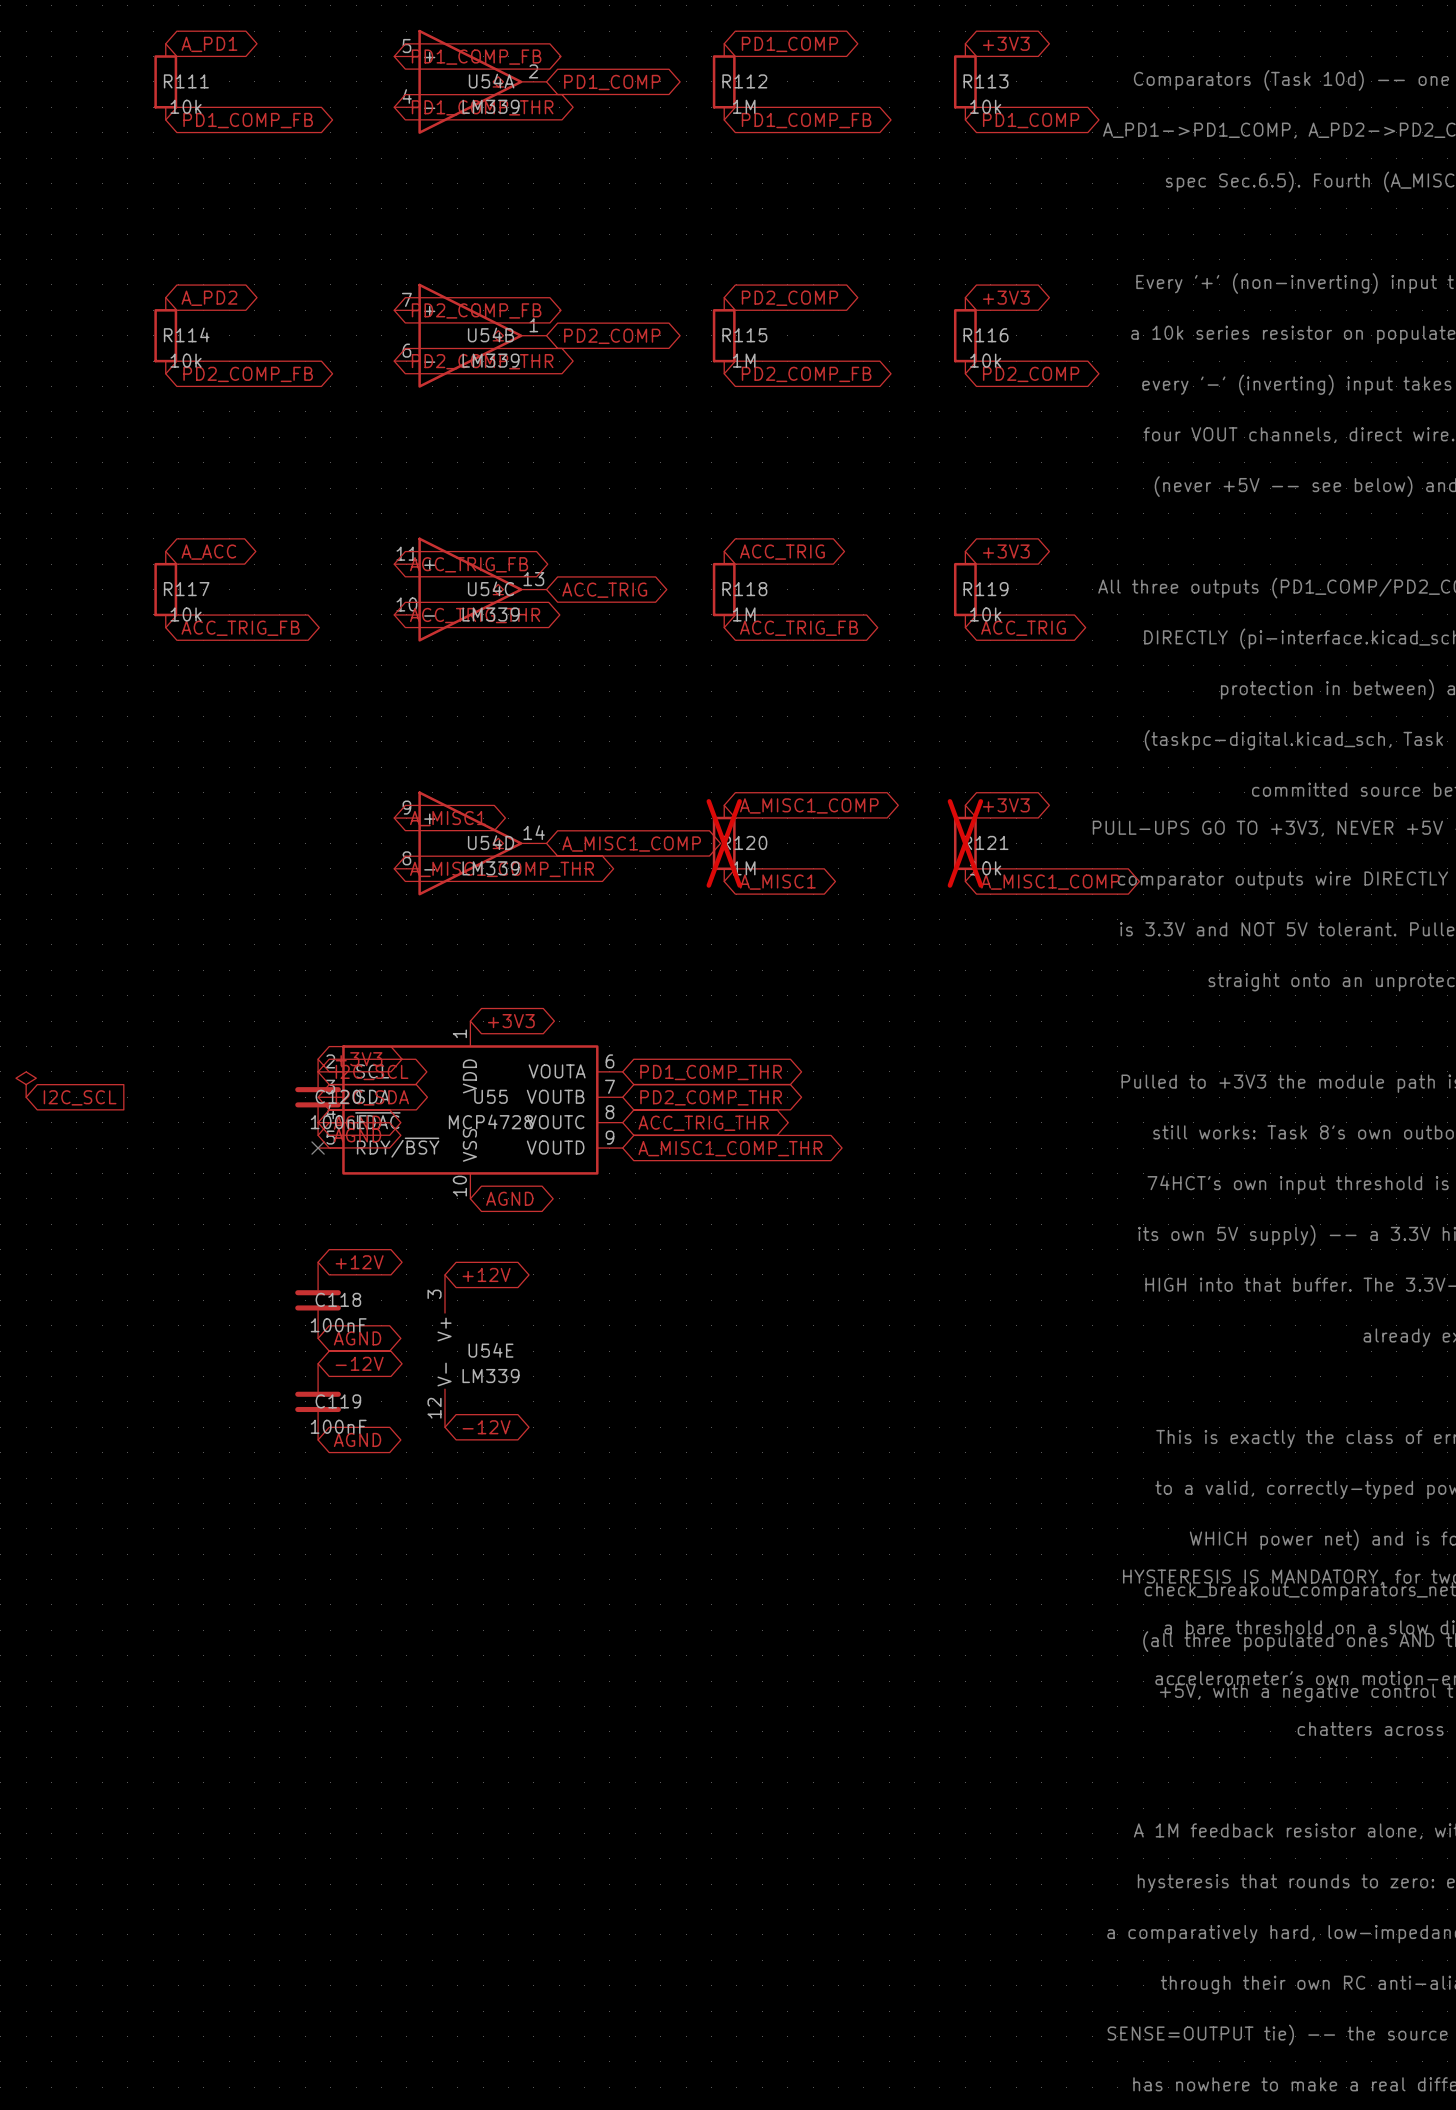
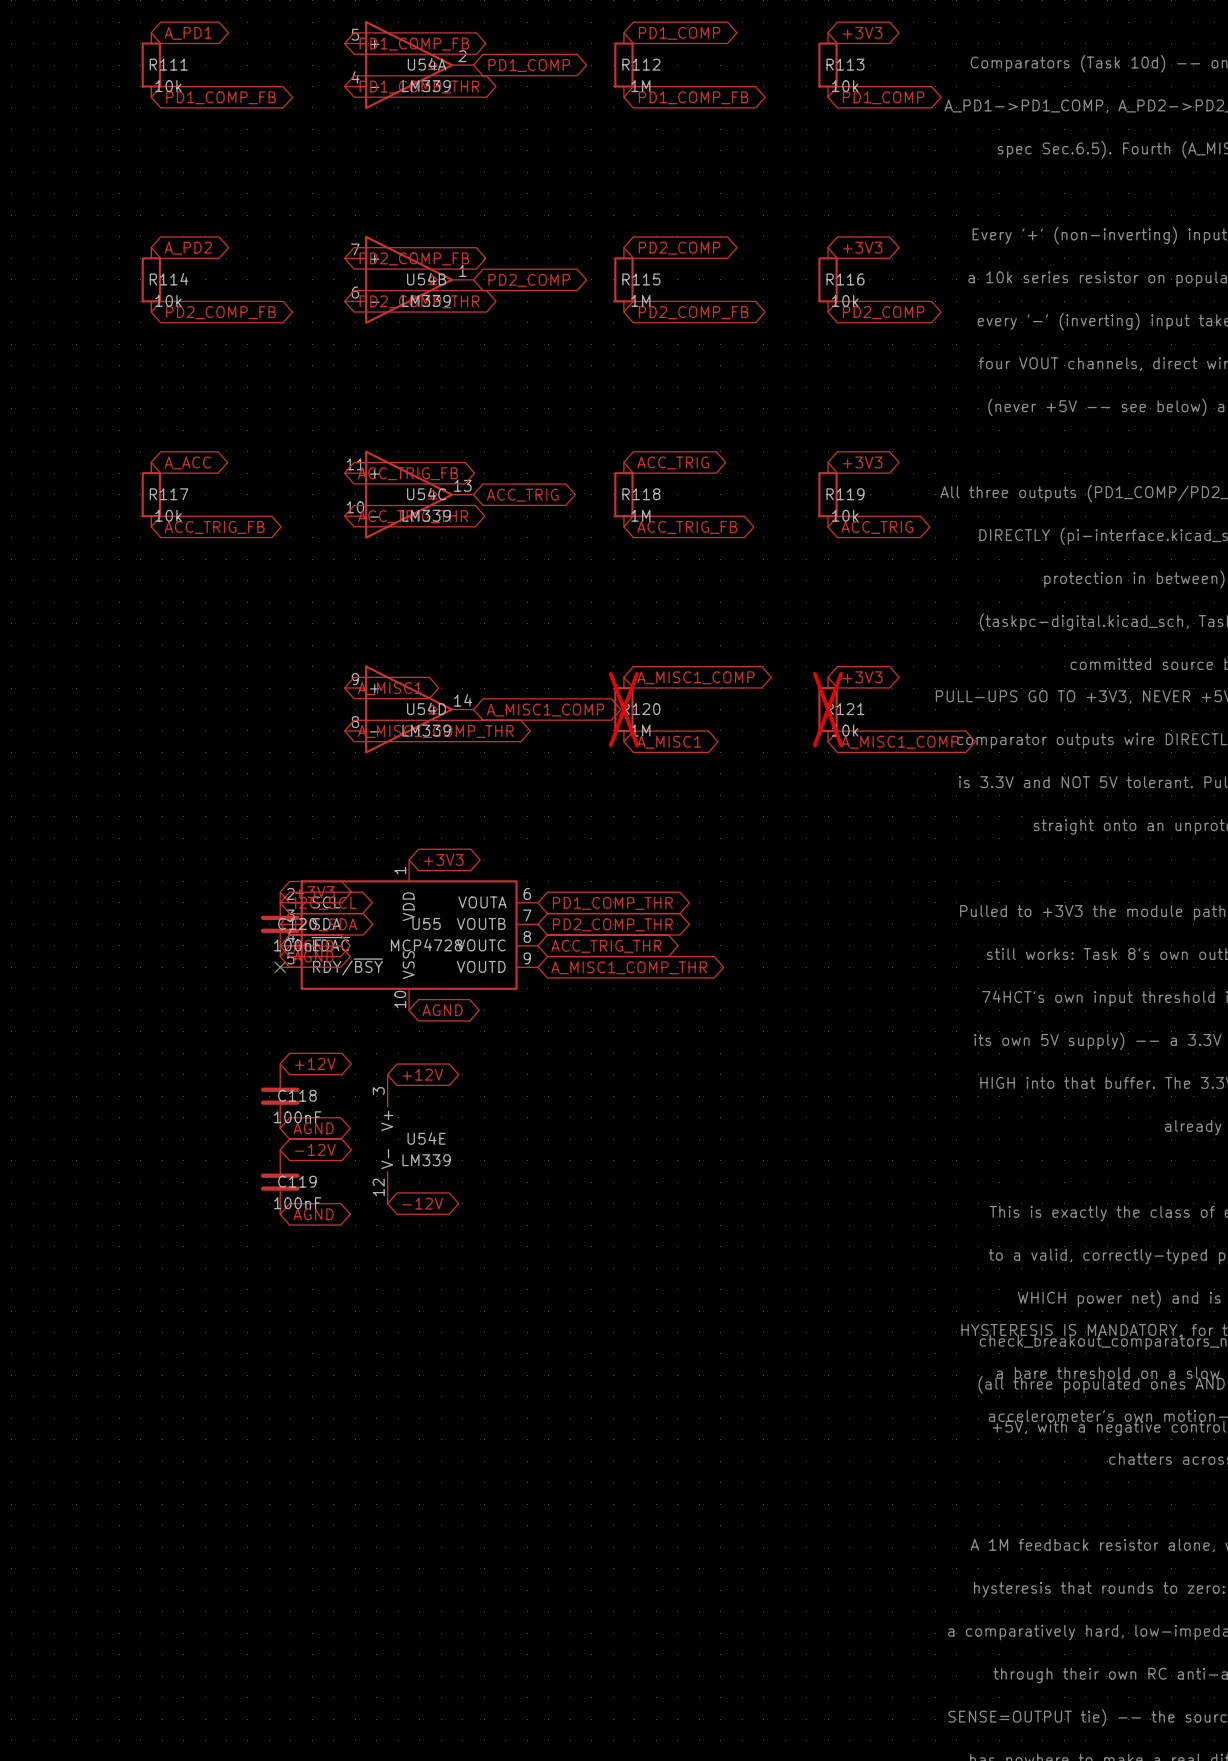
power symbol: (26, 1084) -> none
global label: I2C_SCL (80, 1097) -> none

